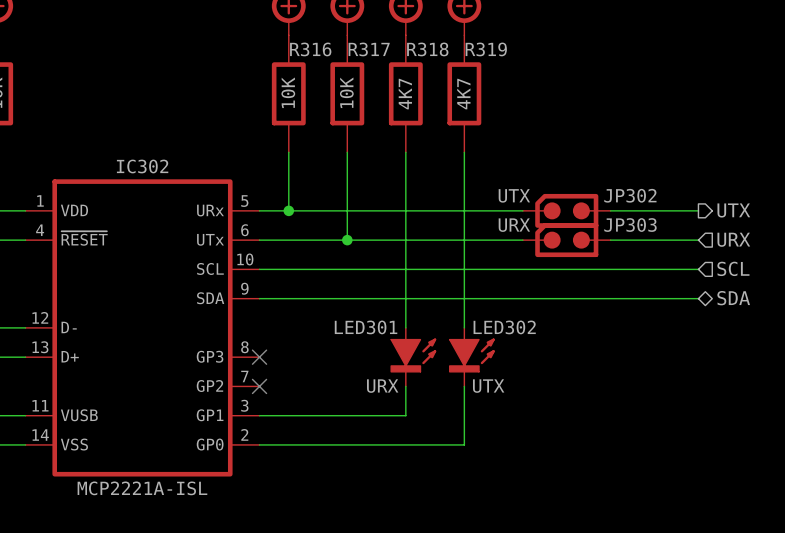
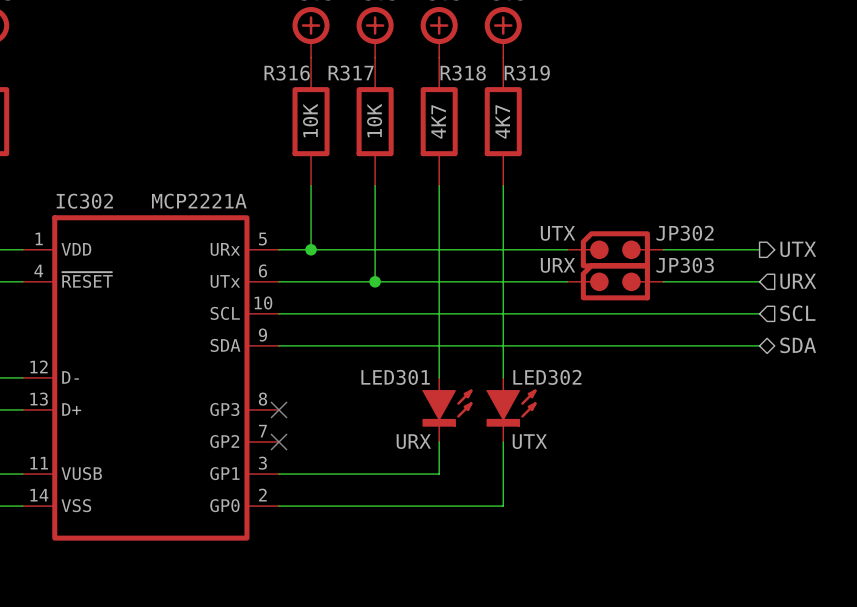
R316 name position: R316 (310, 49) -> R316 (287, 73)
R317 name position: R317 (369, 49) -> R317 (351, 73)
IC302 name position: IC302 (142, 166) -> IC302 (84, 201)
IC302 value: none -> MCP2221A (199, 201)
IC302 text: MCP2221A-ISL (142, 488) -> none

